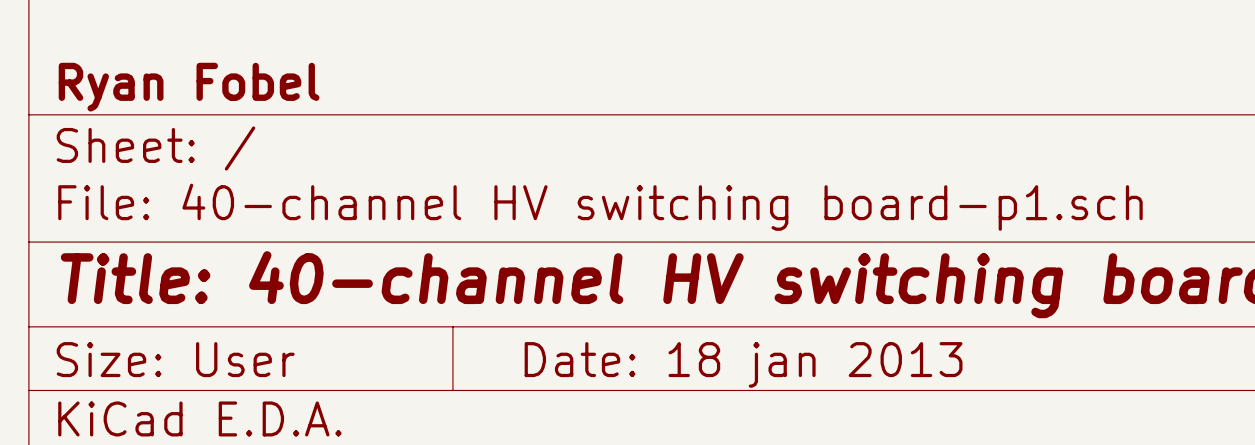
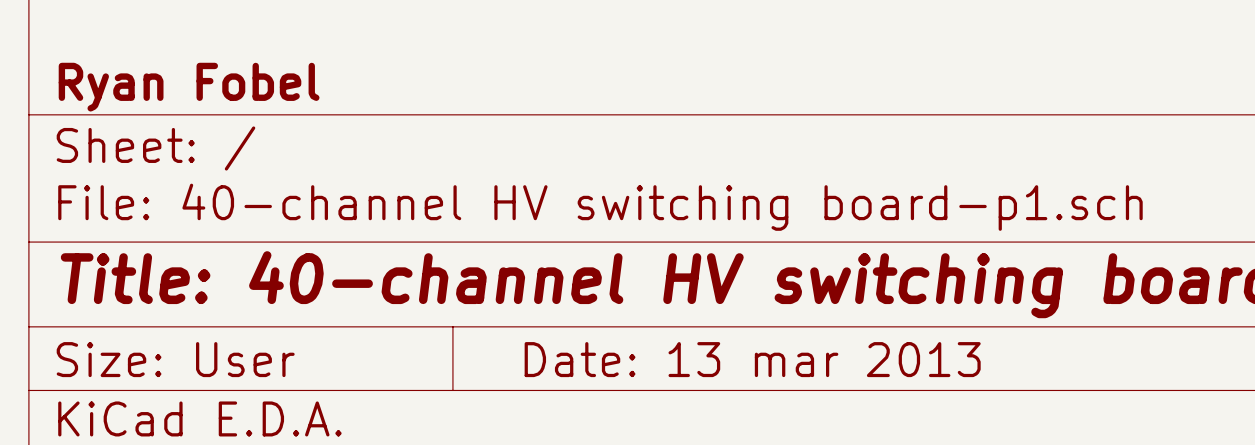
title block: Date: 18 jan 2013 (743, 364) -> Date: 13 mar 2013 (752, 359)

